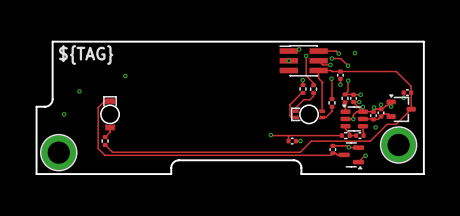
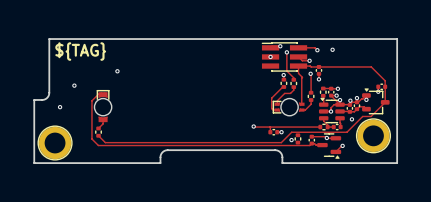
track: (331, 58) (340, 58) (348, 65) -> none
via: (331, 58) -> none
via: (348, 65) -> none
track: (348, 80) (348, 91) (345, 94) -> none
via: (348, 80) -> none
part: none -> (297, 138)
via: none -> (291, 140)

